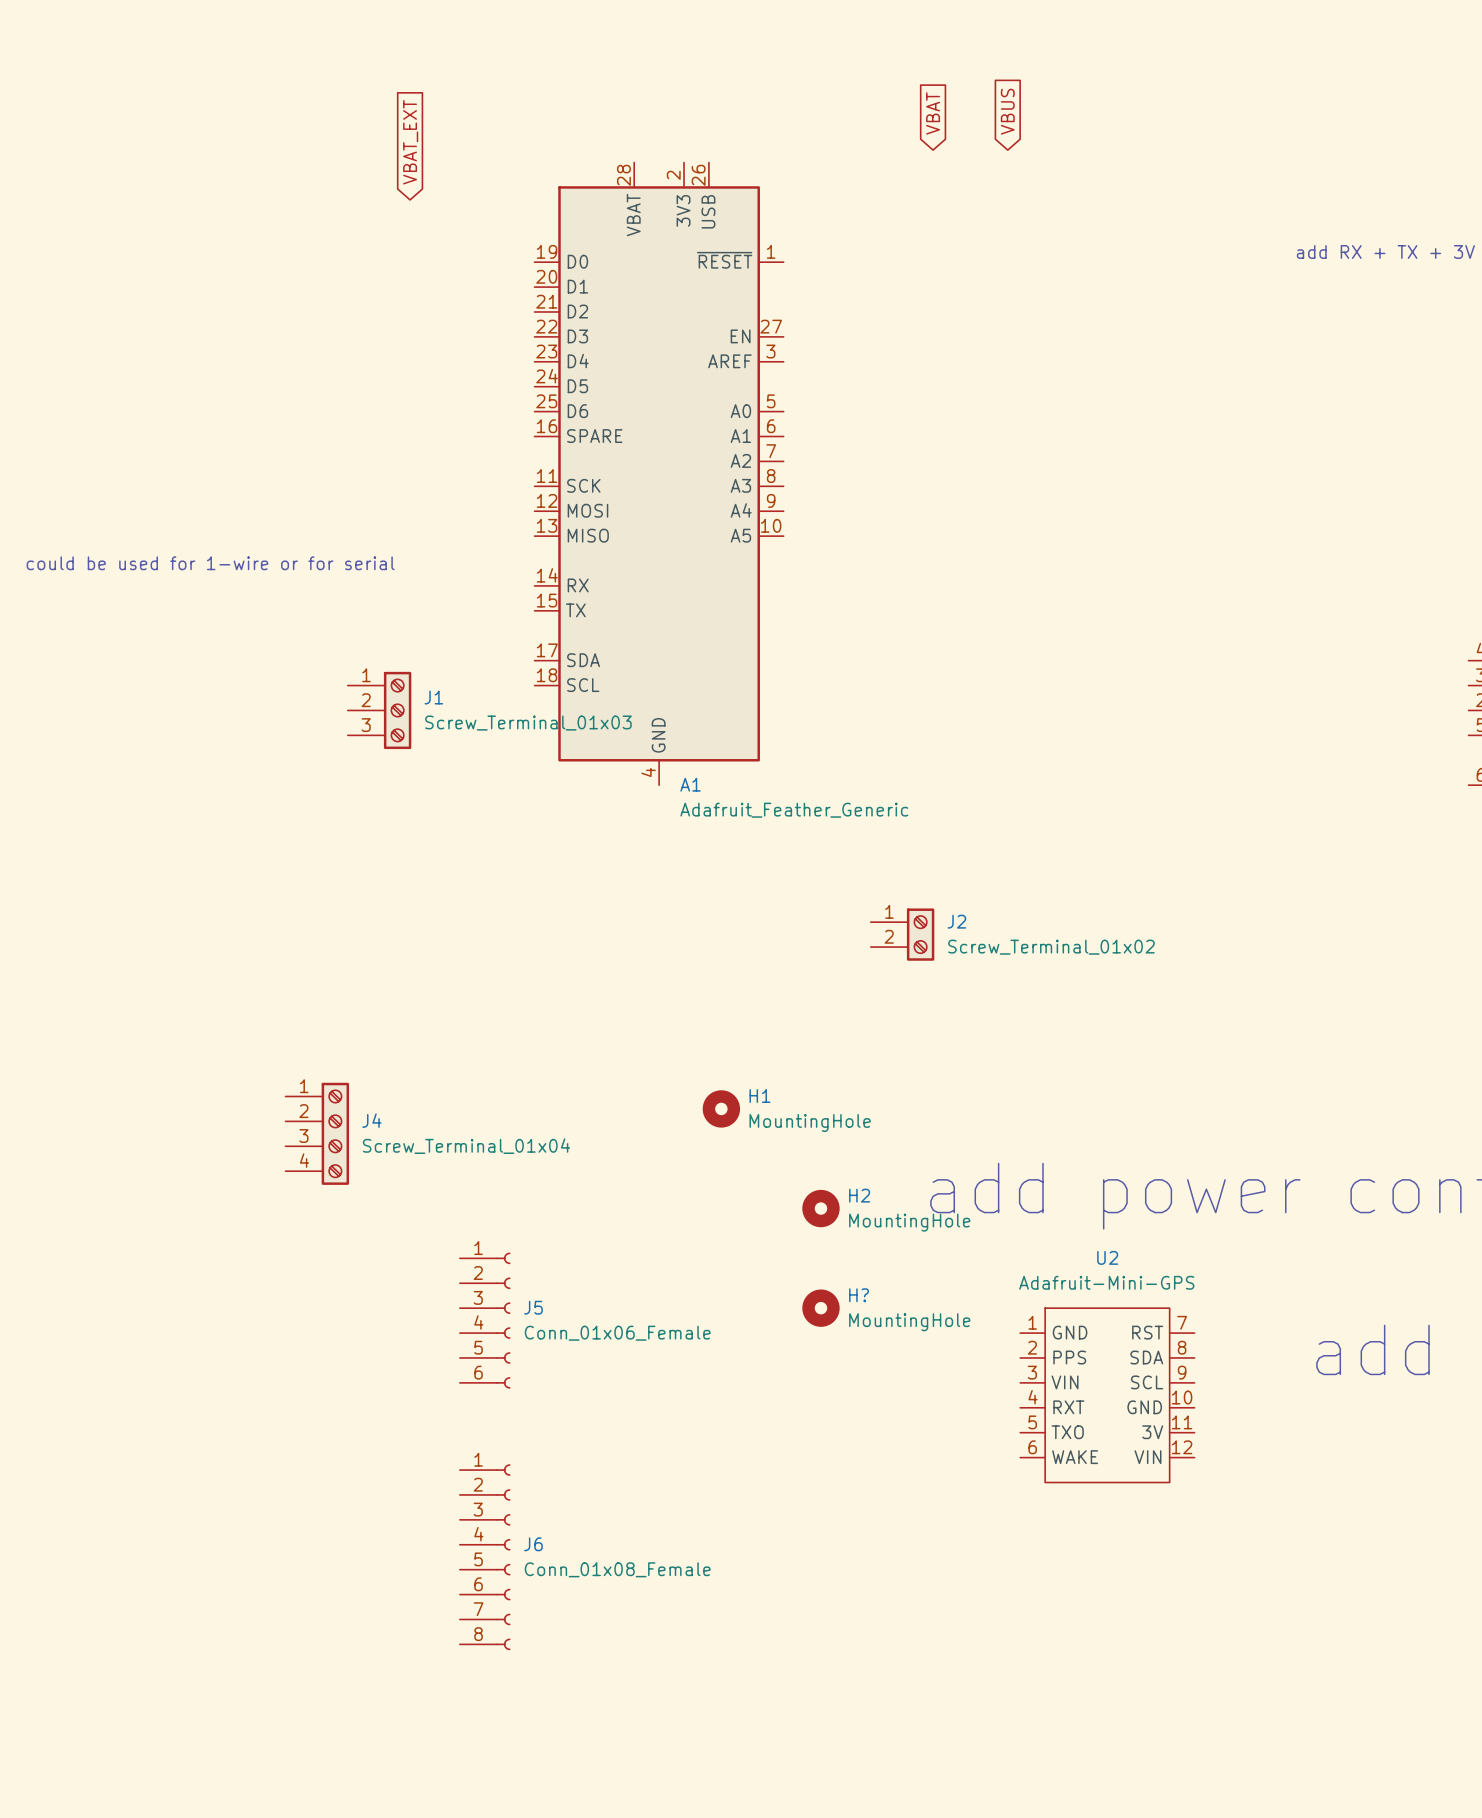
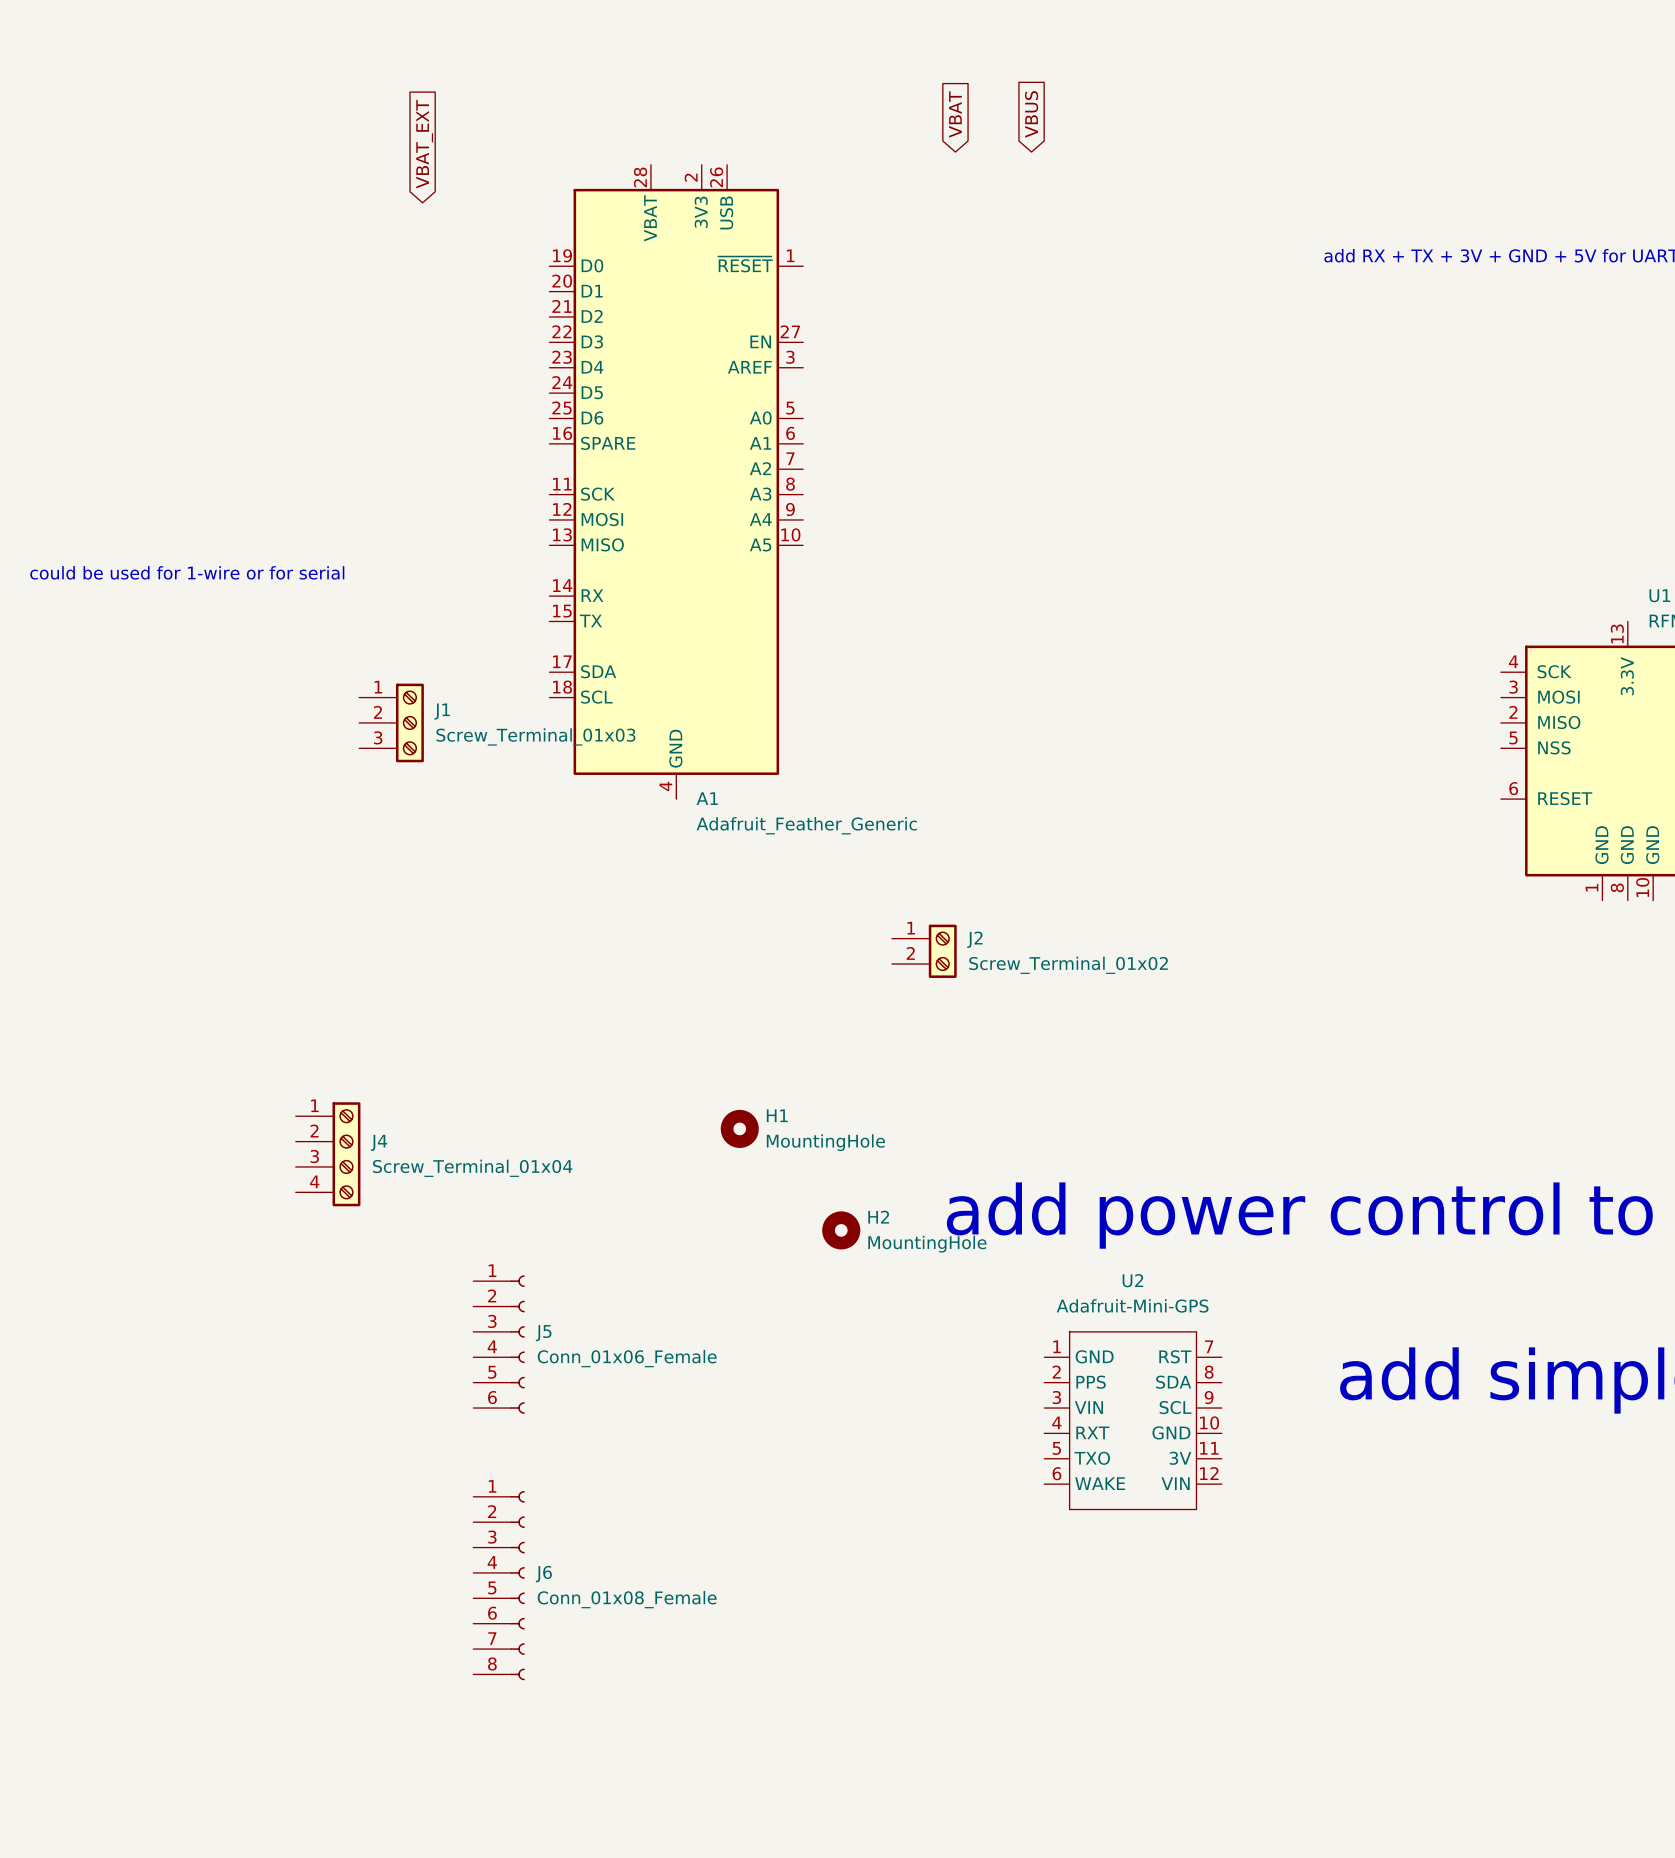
H?: MountingHole (820, 1308) -> none

